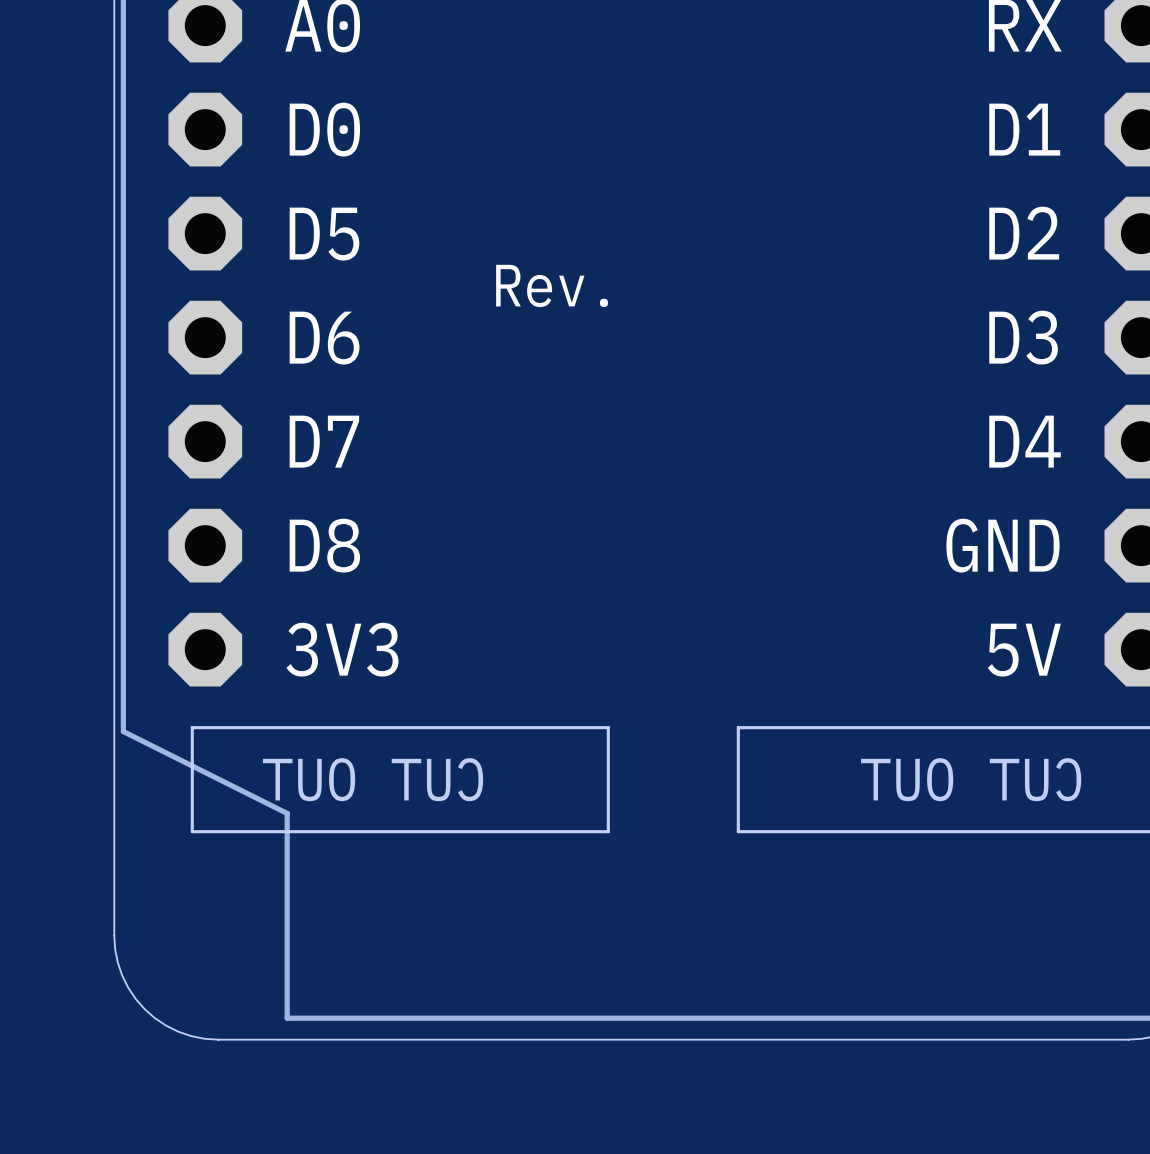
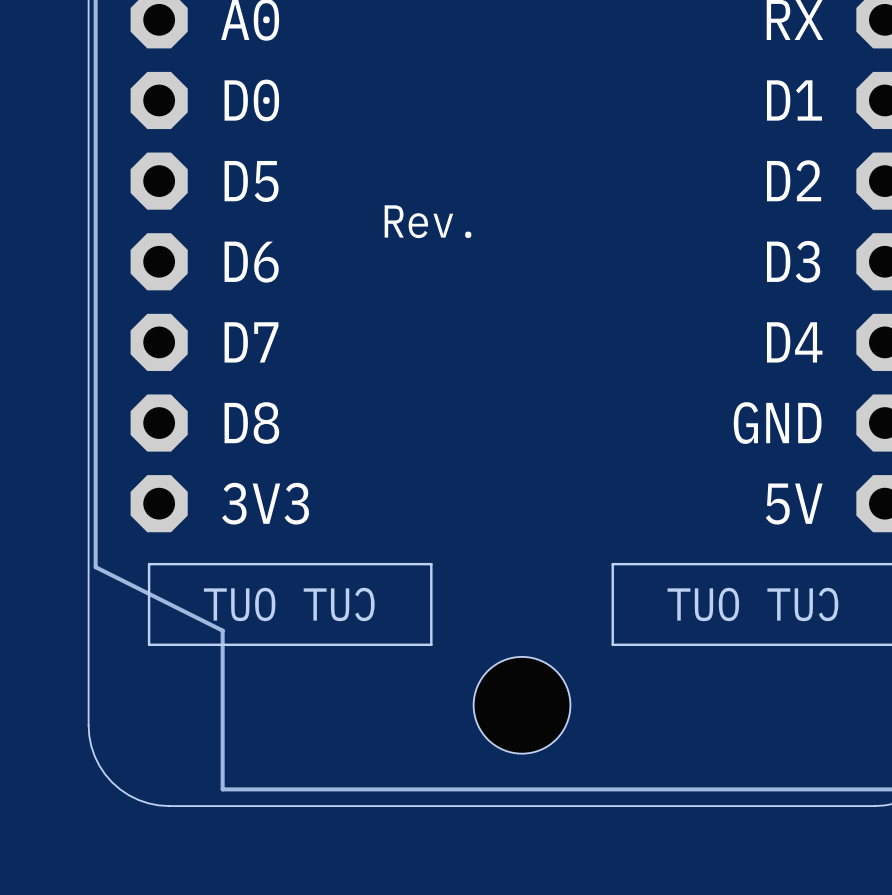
board edge: (556, 727) (608, 727) (608, 831) (556, 831) -> (431, 564) (431, 644)
board edge: (790, 727) (738, 727) (738, 831) (790, 831) -> (612, 564) (612, 644)
hole: none -> (522, 705)

